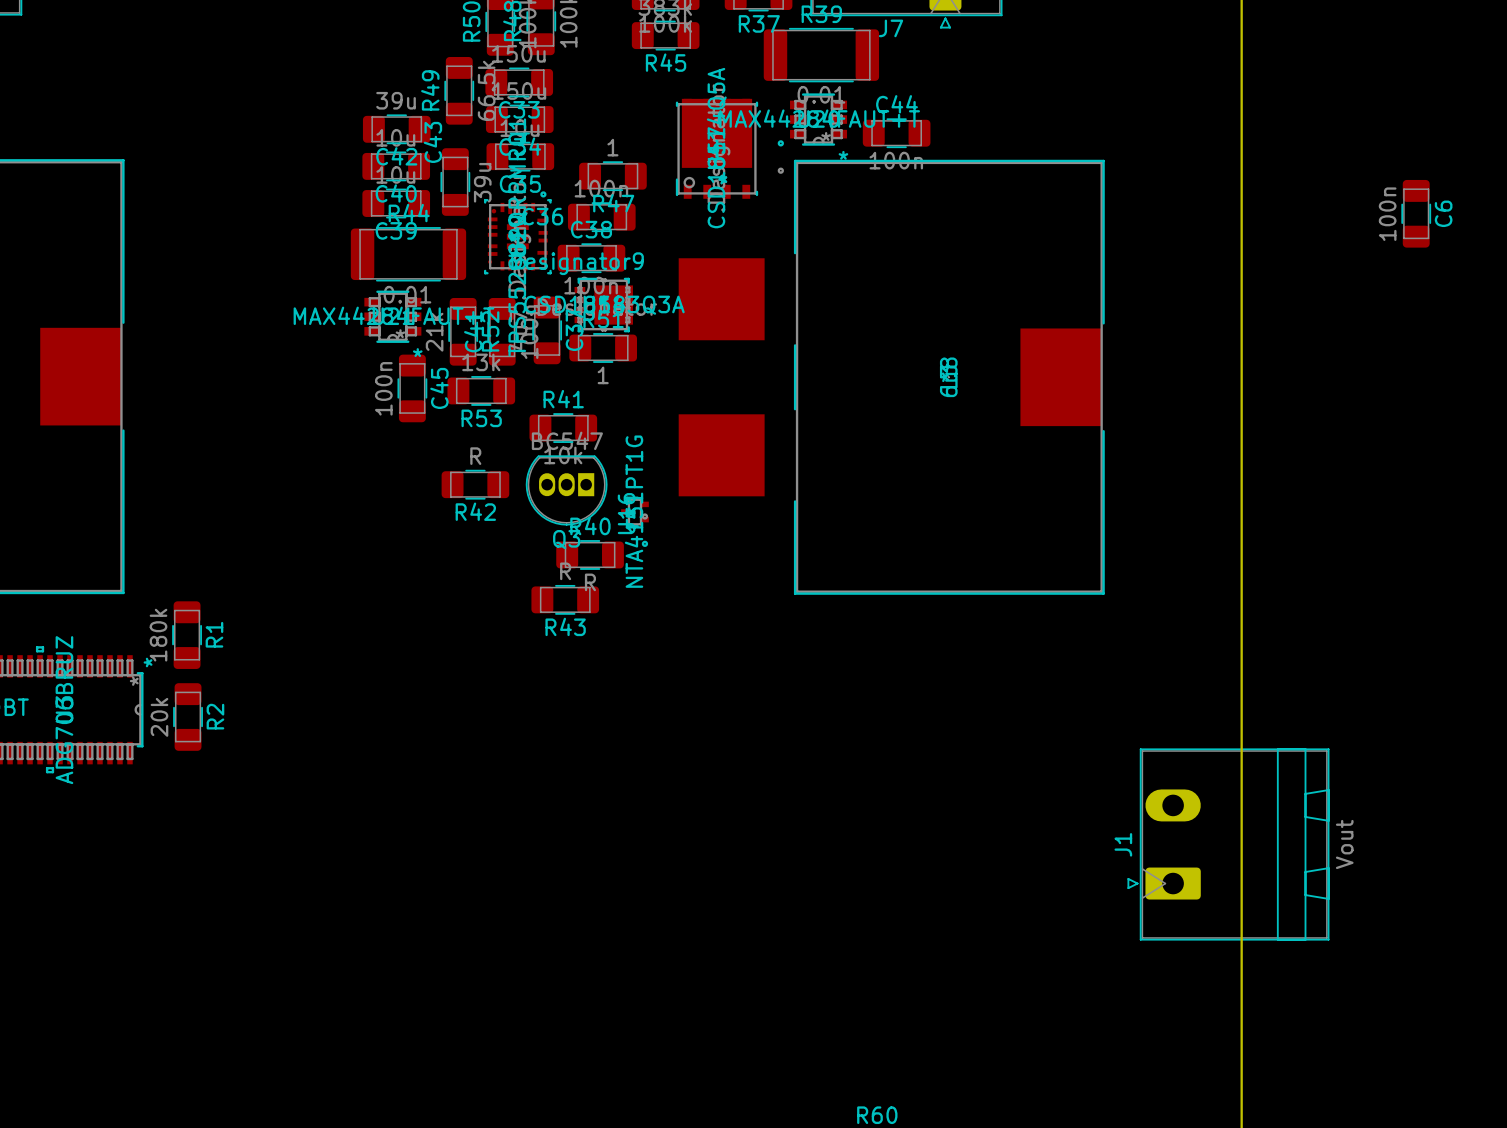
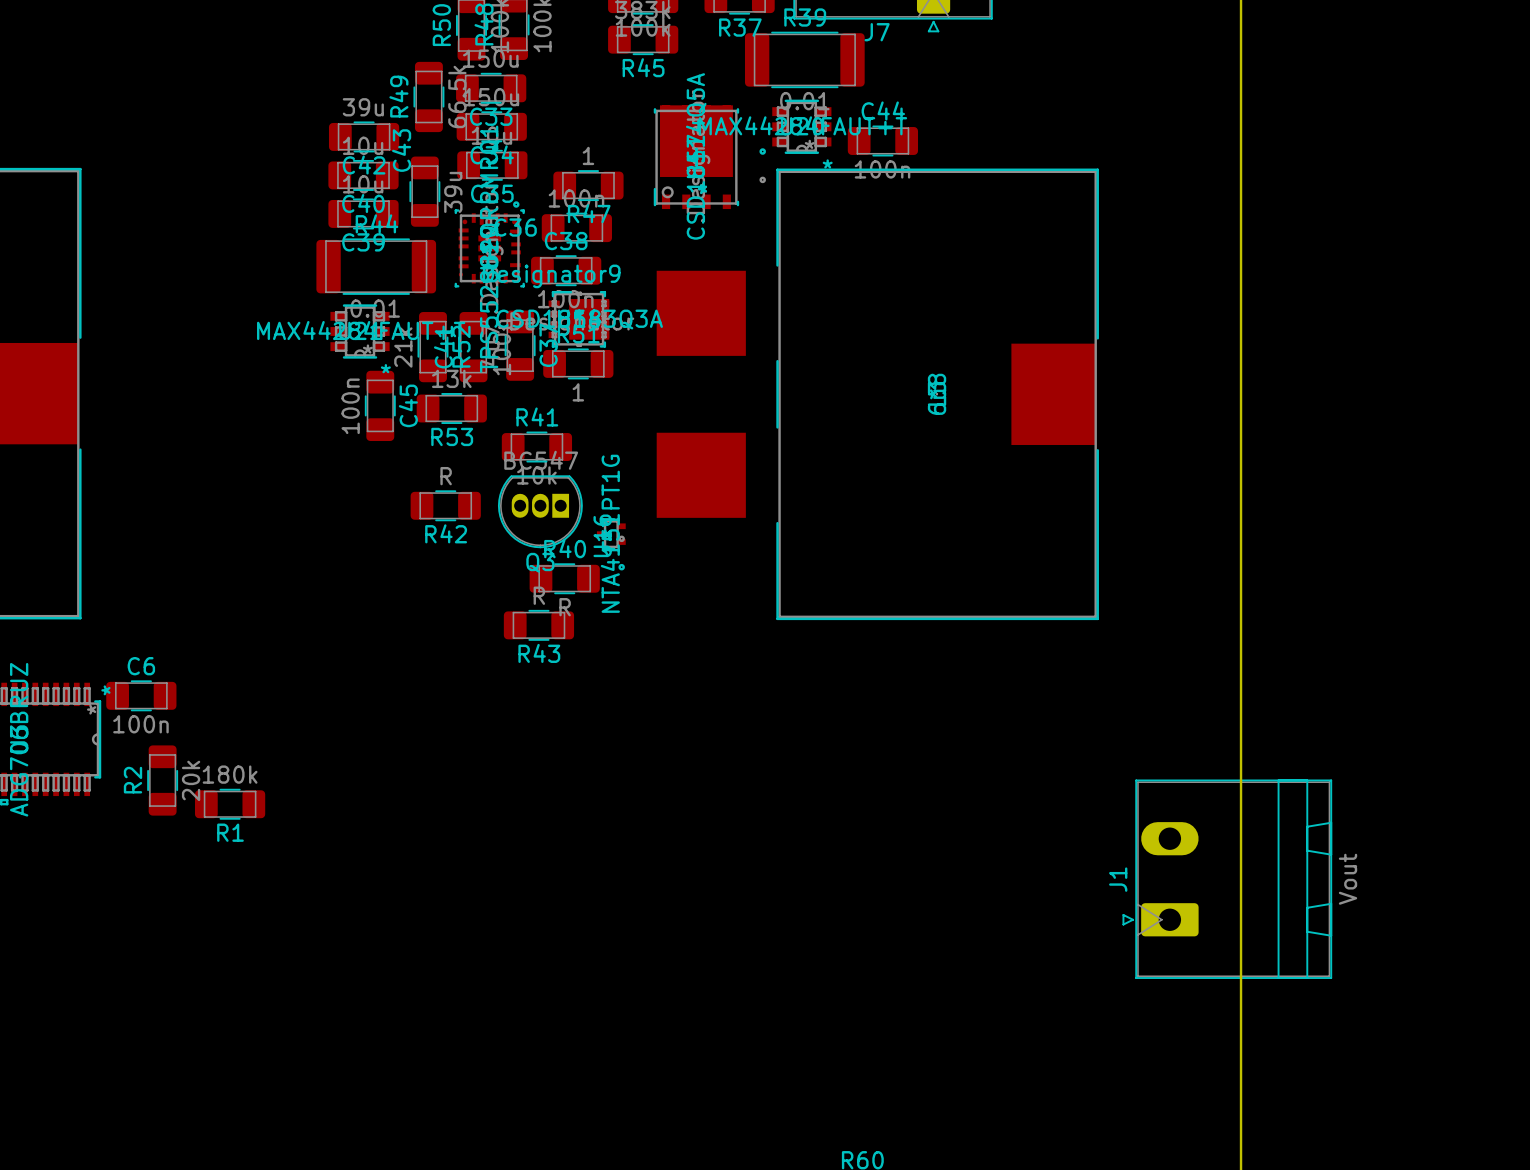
C6 rotation: 0° (1416, 213) -> 90° clockwise (141, 695)
C6 position: (1416, 213) -> (141, 695)
C6 name position: C6 (1443, 213) -> C6 (141, 666)
C6 value position: 100n (1387, 214) -> 100n (140, 724)
R1 rotation: 0° (187, 635) -> 90° clockwise (230, 804)
R1 position: (187, 635) -> (230, 804)
R2 name position: R2 (215, 716) -> R2 (132, 780)
R2 value position: 20k (159, 717) -> 20k (191, 780)
R2 position: (188, 717) -> (162, 780)

